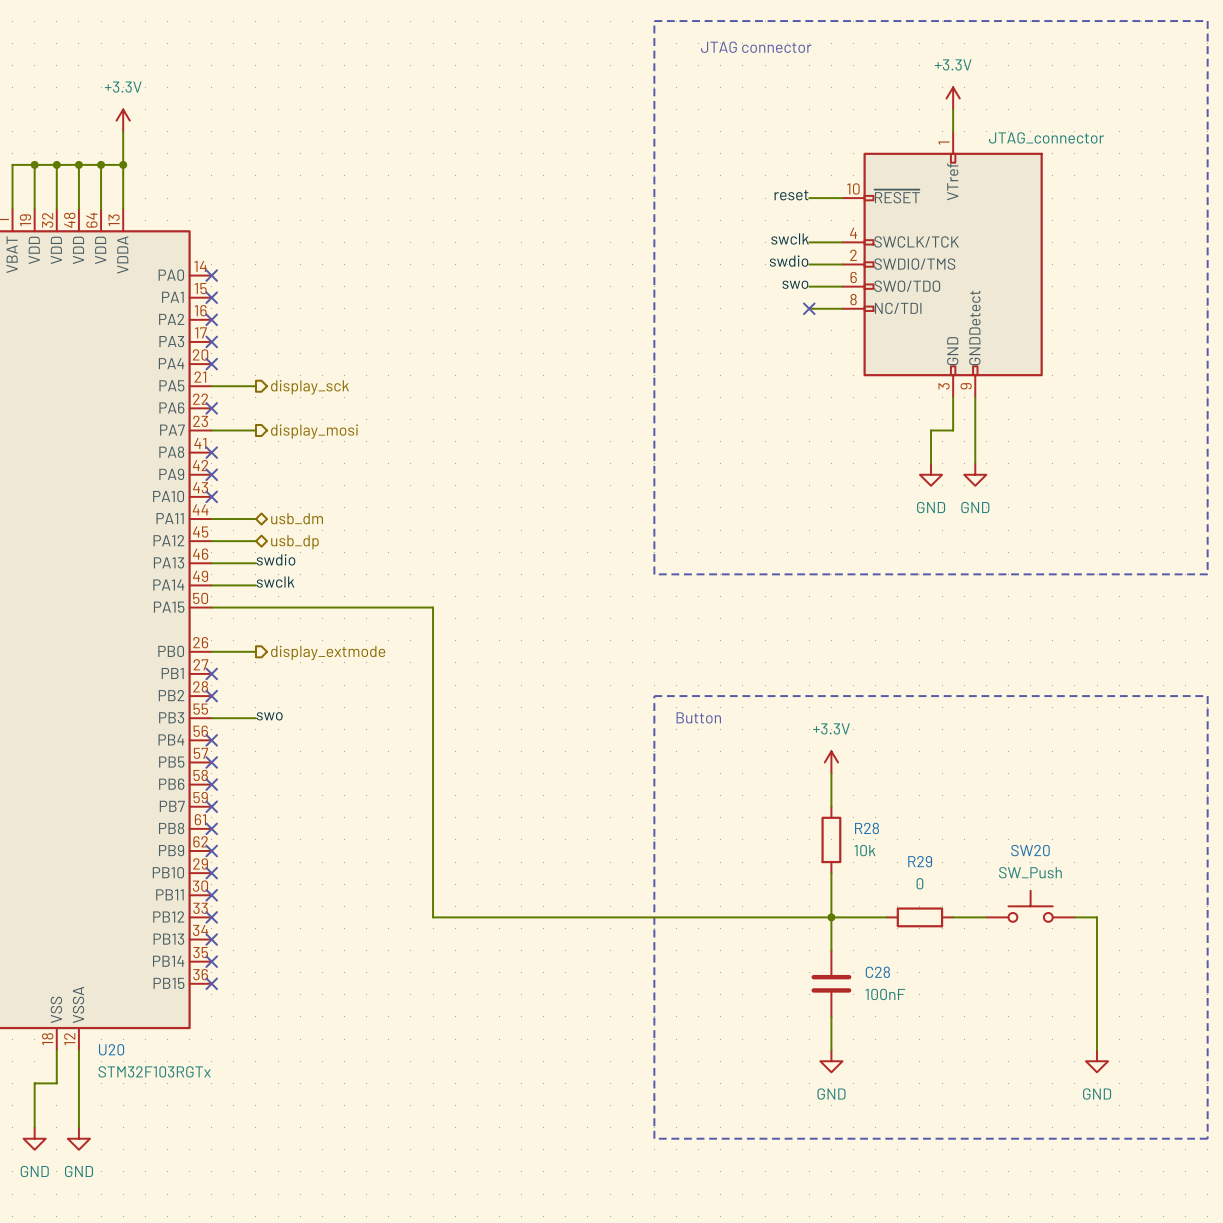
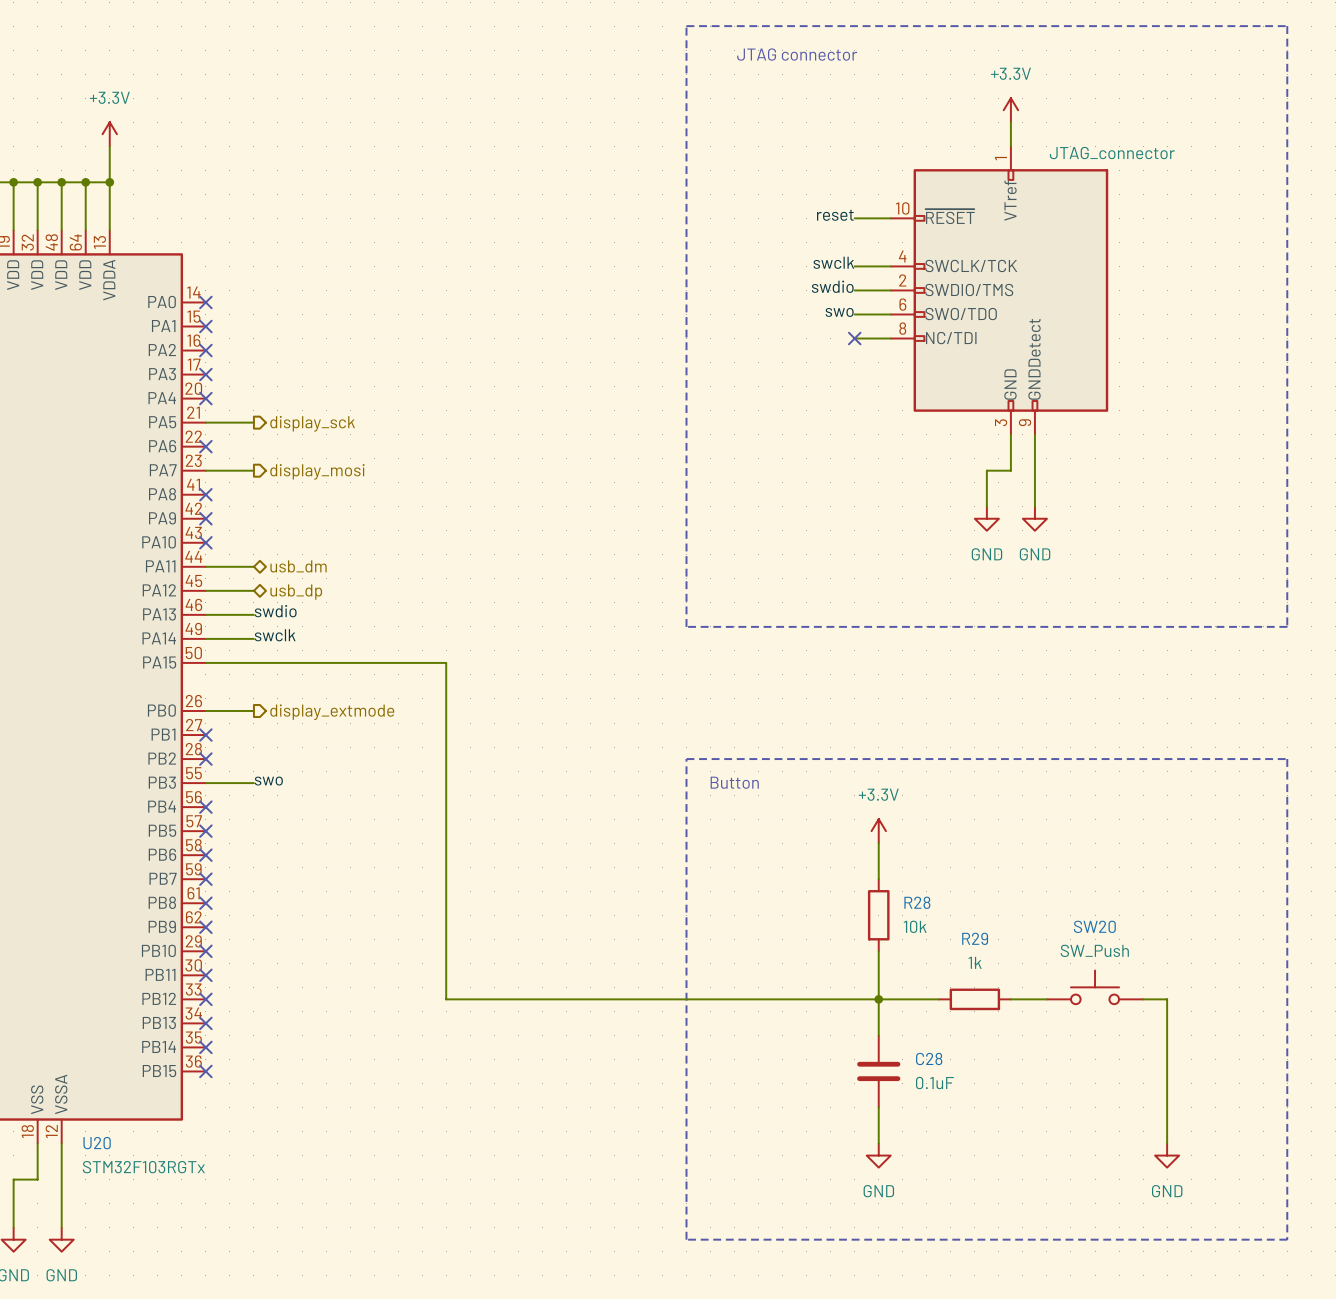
R29 value: 0 (919, 883) -> 1k (975, 962)
C28 value: 100nF (885, 994) -> 0.1uF (934, 1083)

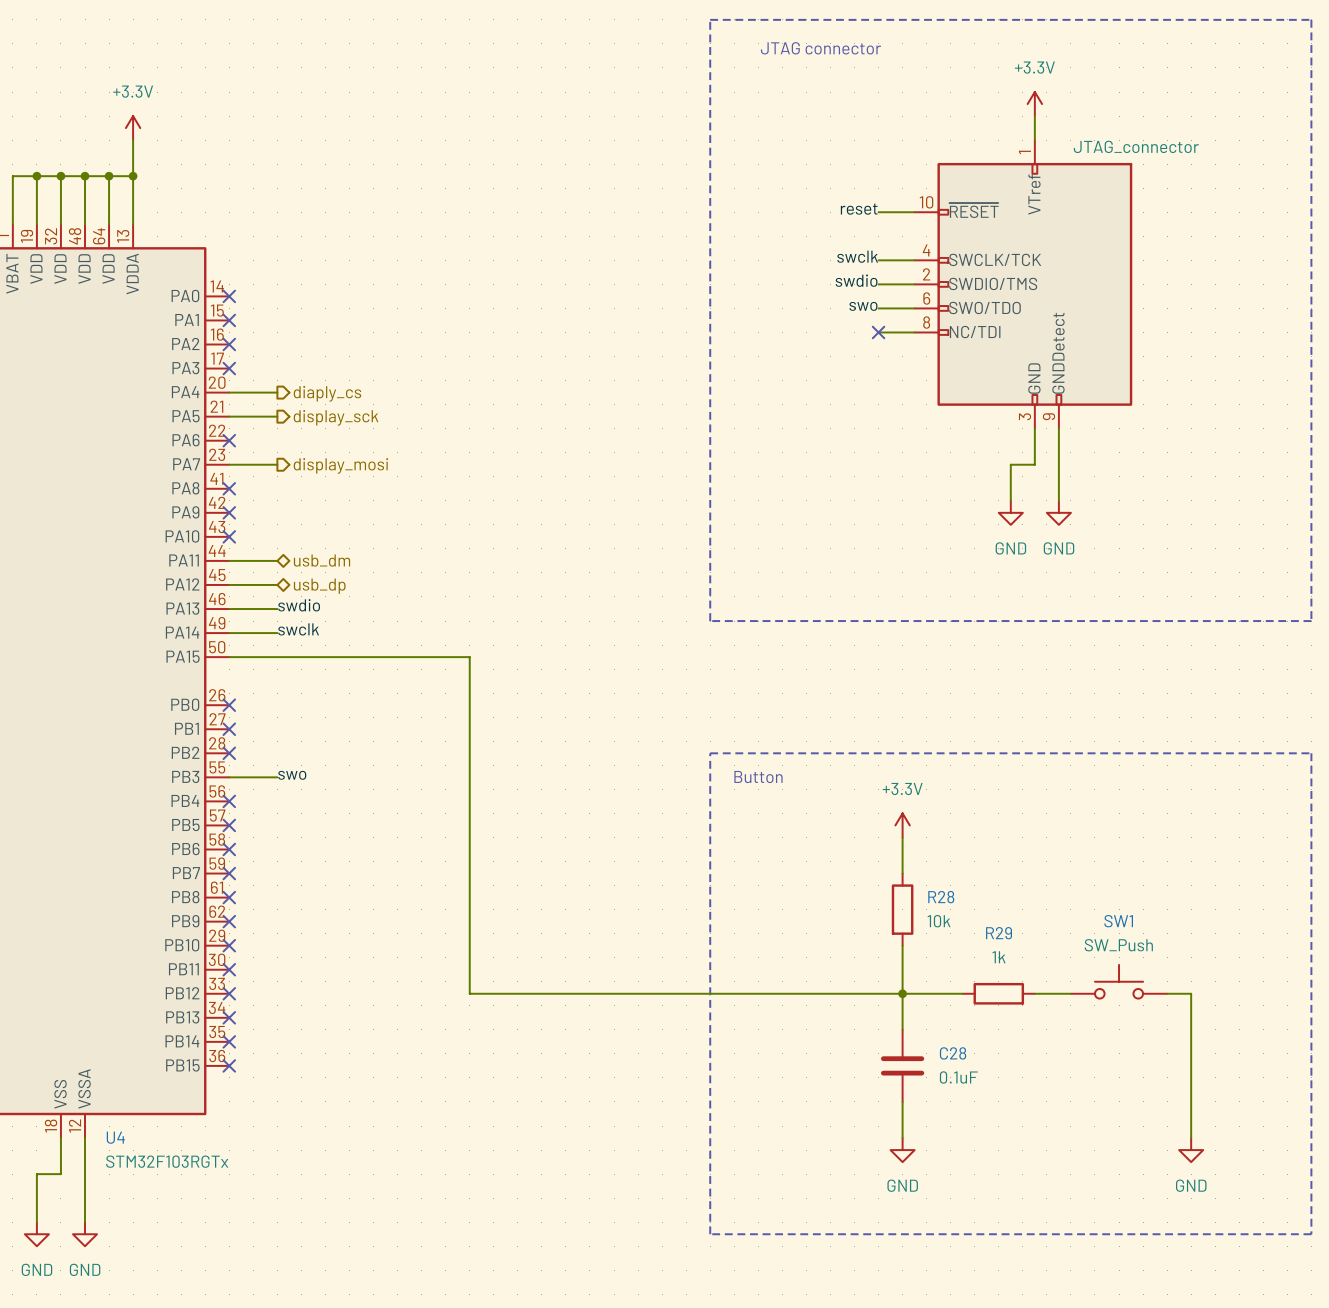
wire: none -> (229, 392) (277, 392)
no-connect mark: (205, 398) -> none
hierarchical label: none -> diaply_cs (327, 393)
wire: (205, 710) (253, 710) -> none
no-connect mark: none -> (229, 705)
hierarchical label: display_extmode (332, 712) -> none
SW20 name: SW20 (1094, 926) -> SW1 (1118, 921)
U20 name: U20 (97, 1143) -> U4 (115, 1137)

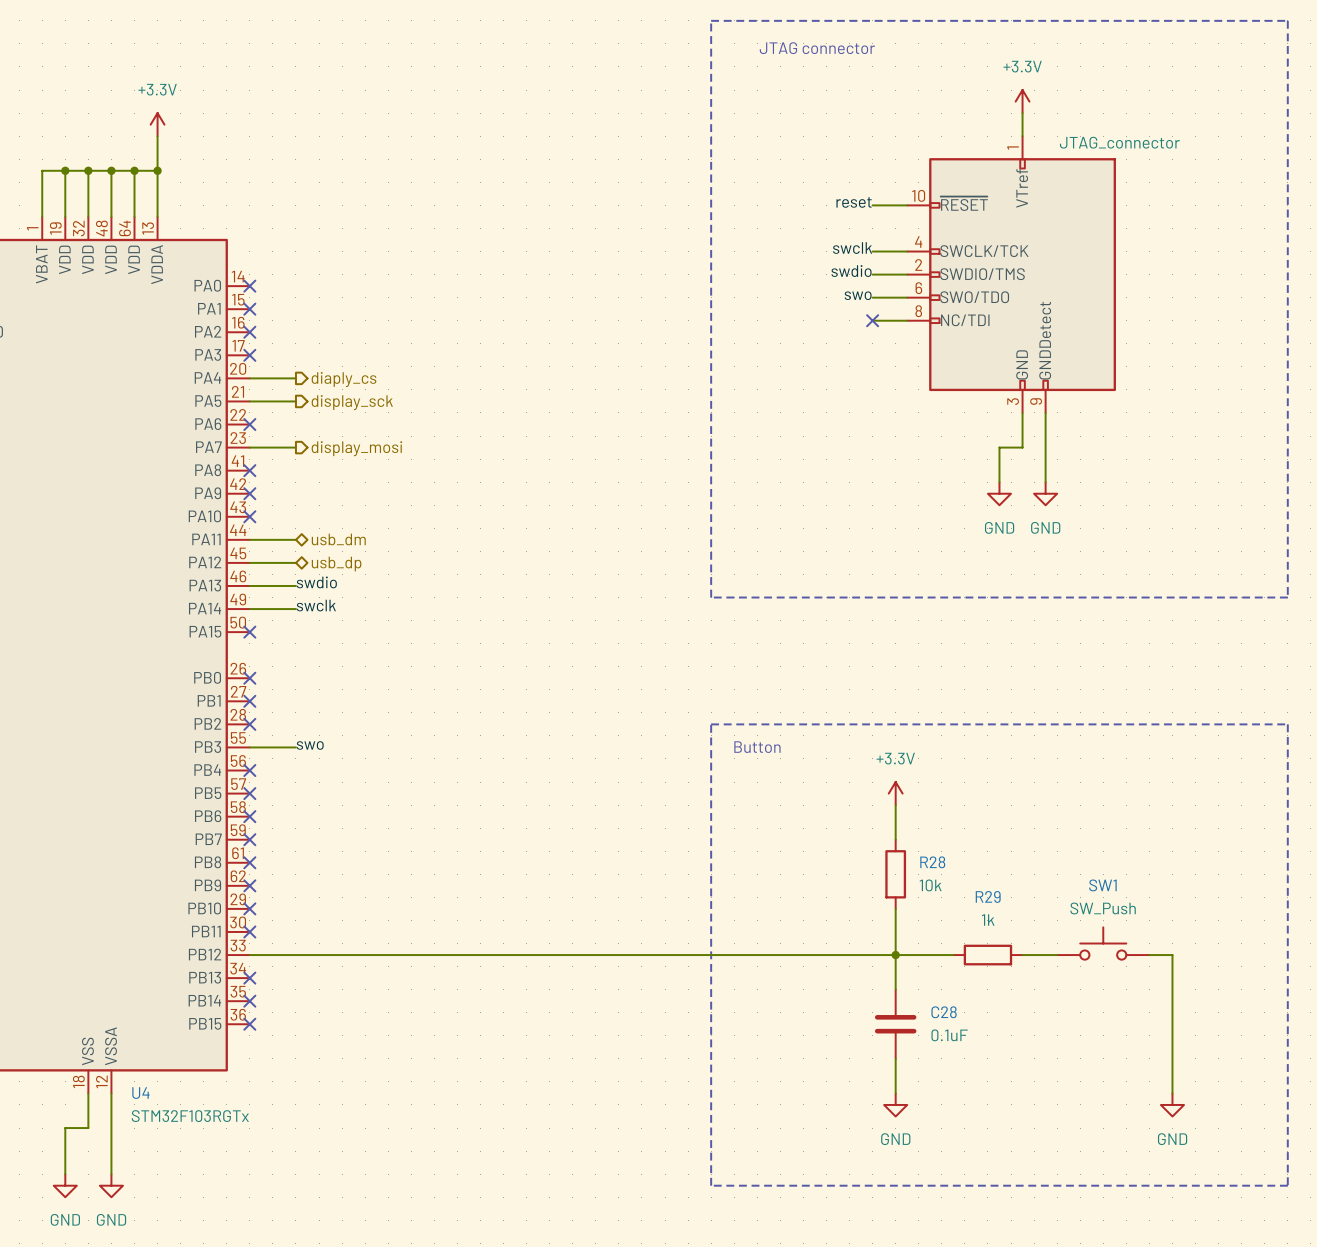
wire: (229, 657) (469, 657) (469, 993) -> (249, 955) (480, 955)
no-connect mark: none -> (249, 632)
no-connect mark: (229, 993) -> none

